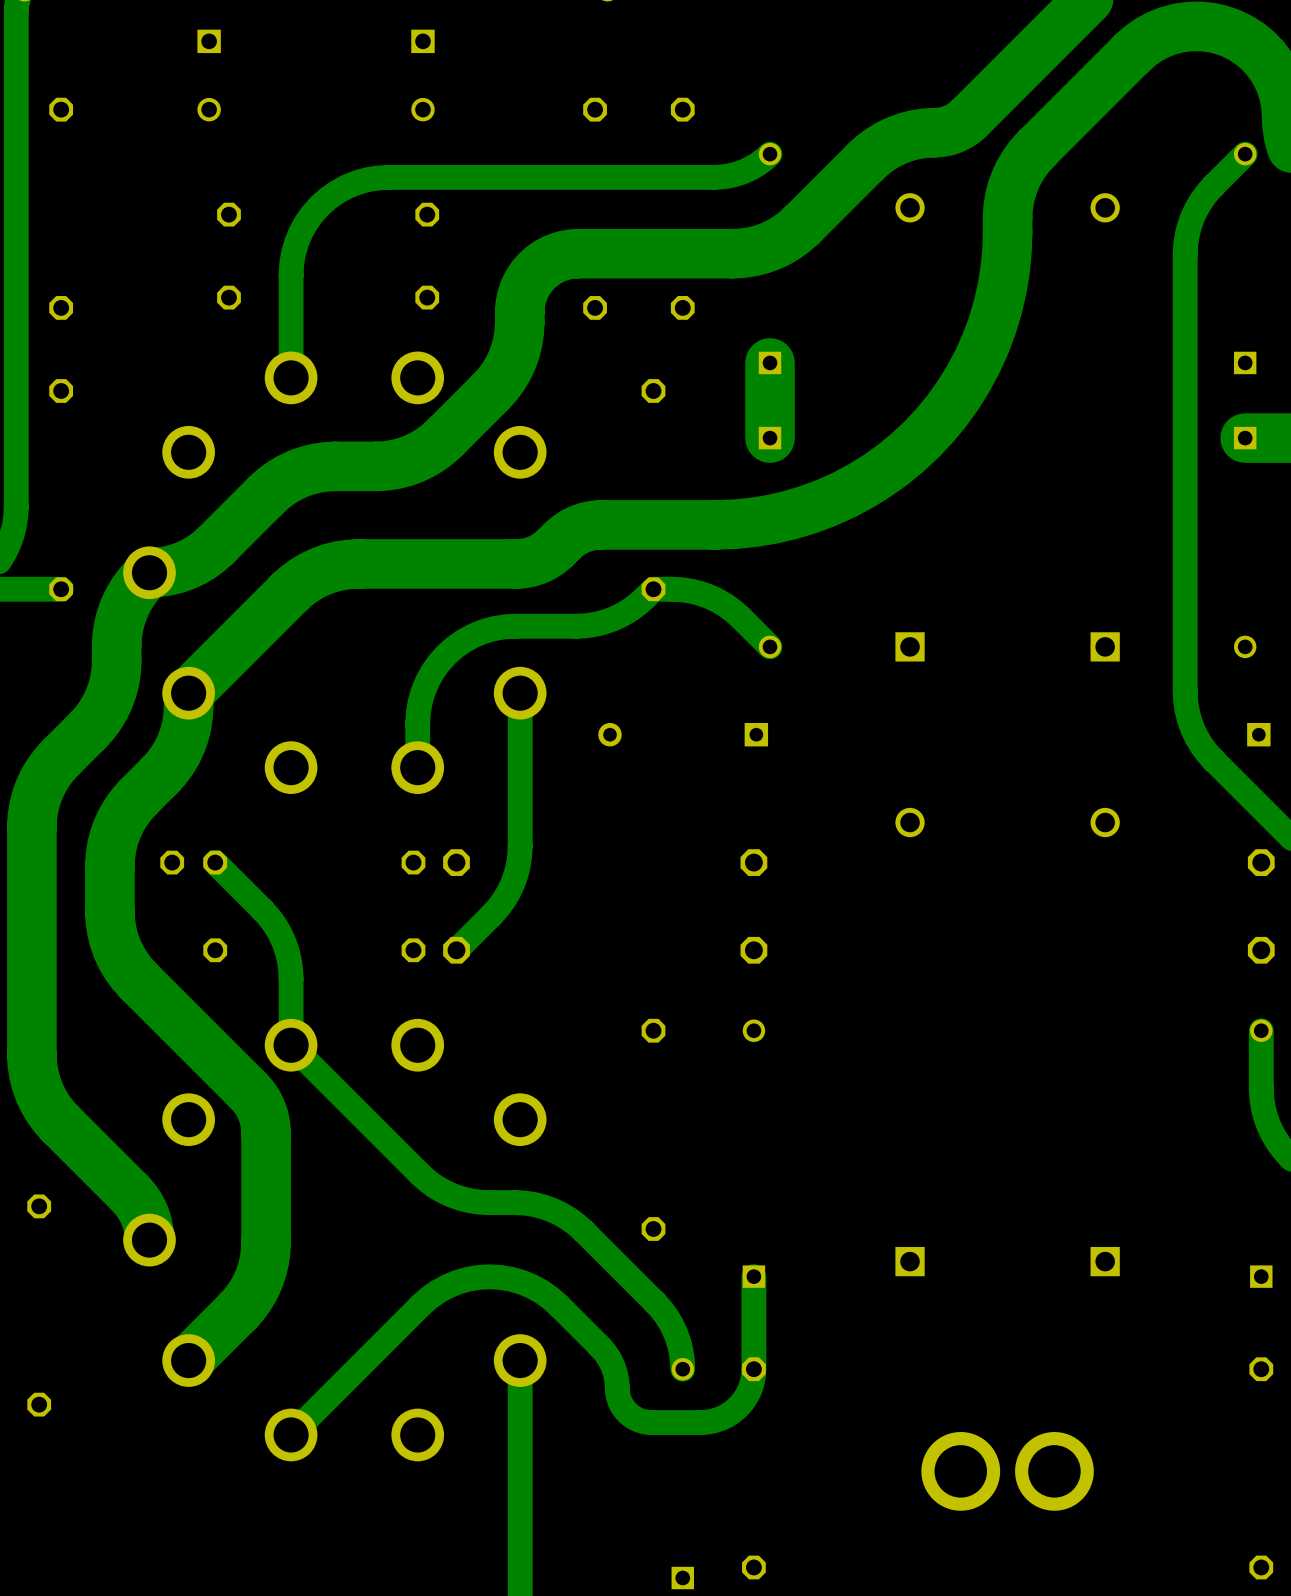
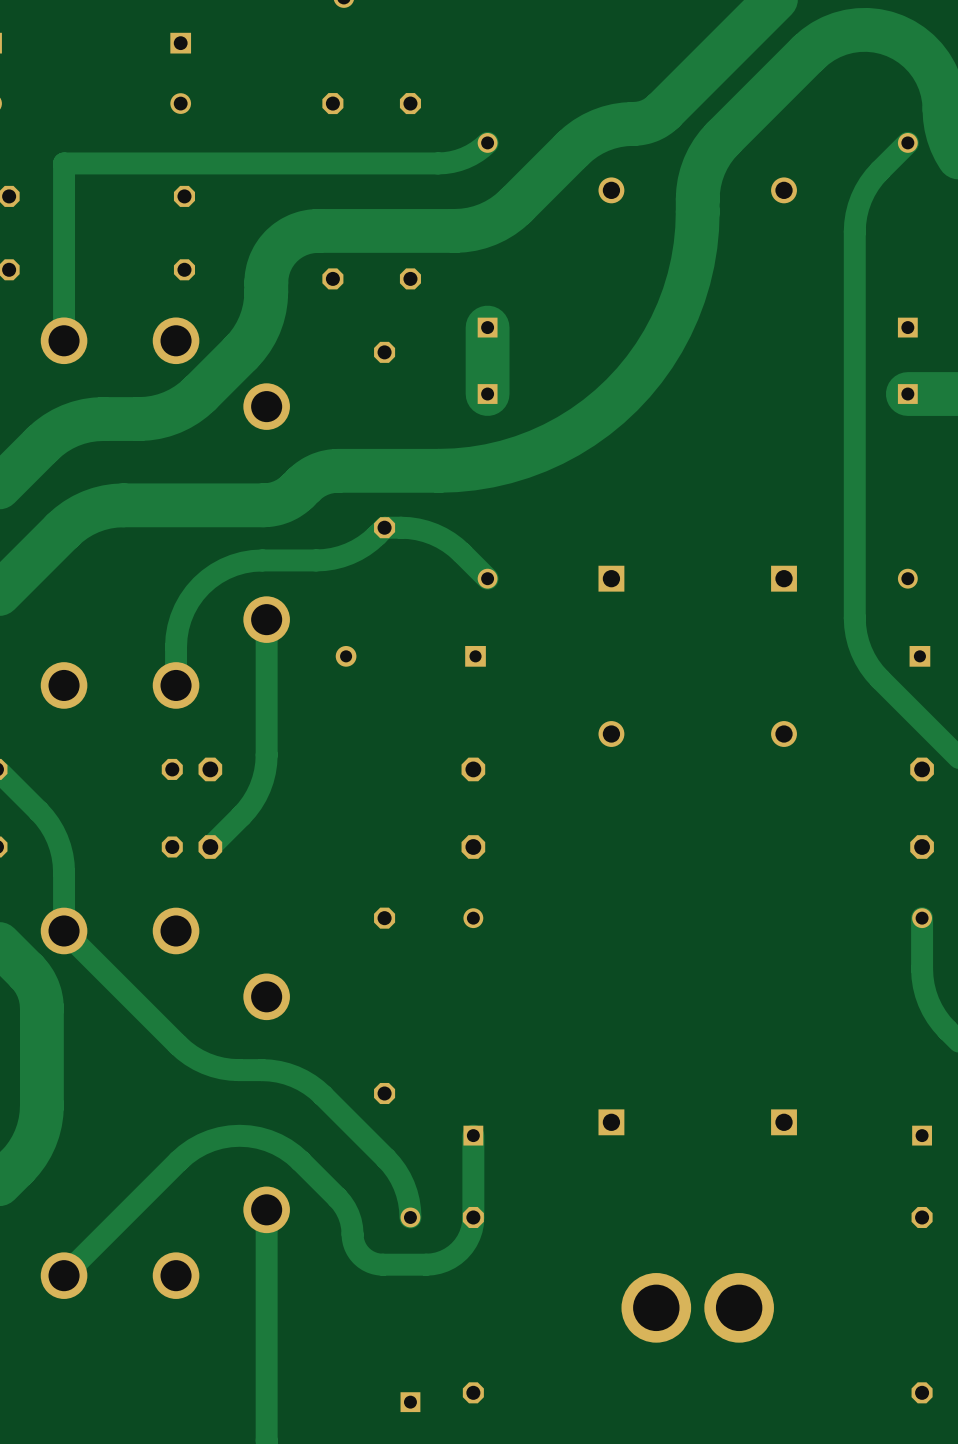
track: (388, 177) (356, 182) (336, 192) (319, 205) (306, 223) (296, 242) (291, 274) -> (150, 163) (64, 163) (64, 249)

